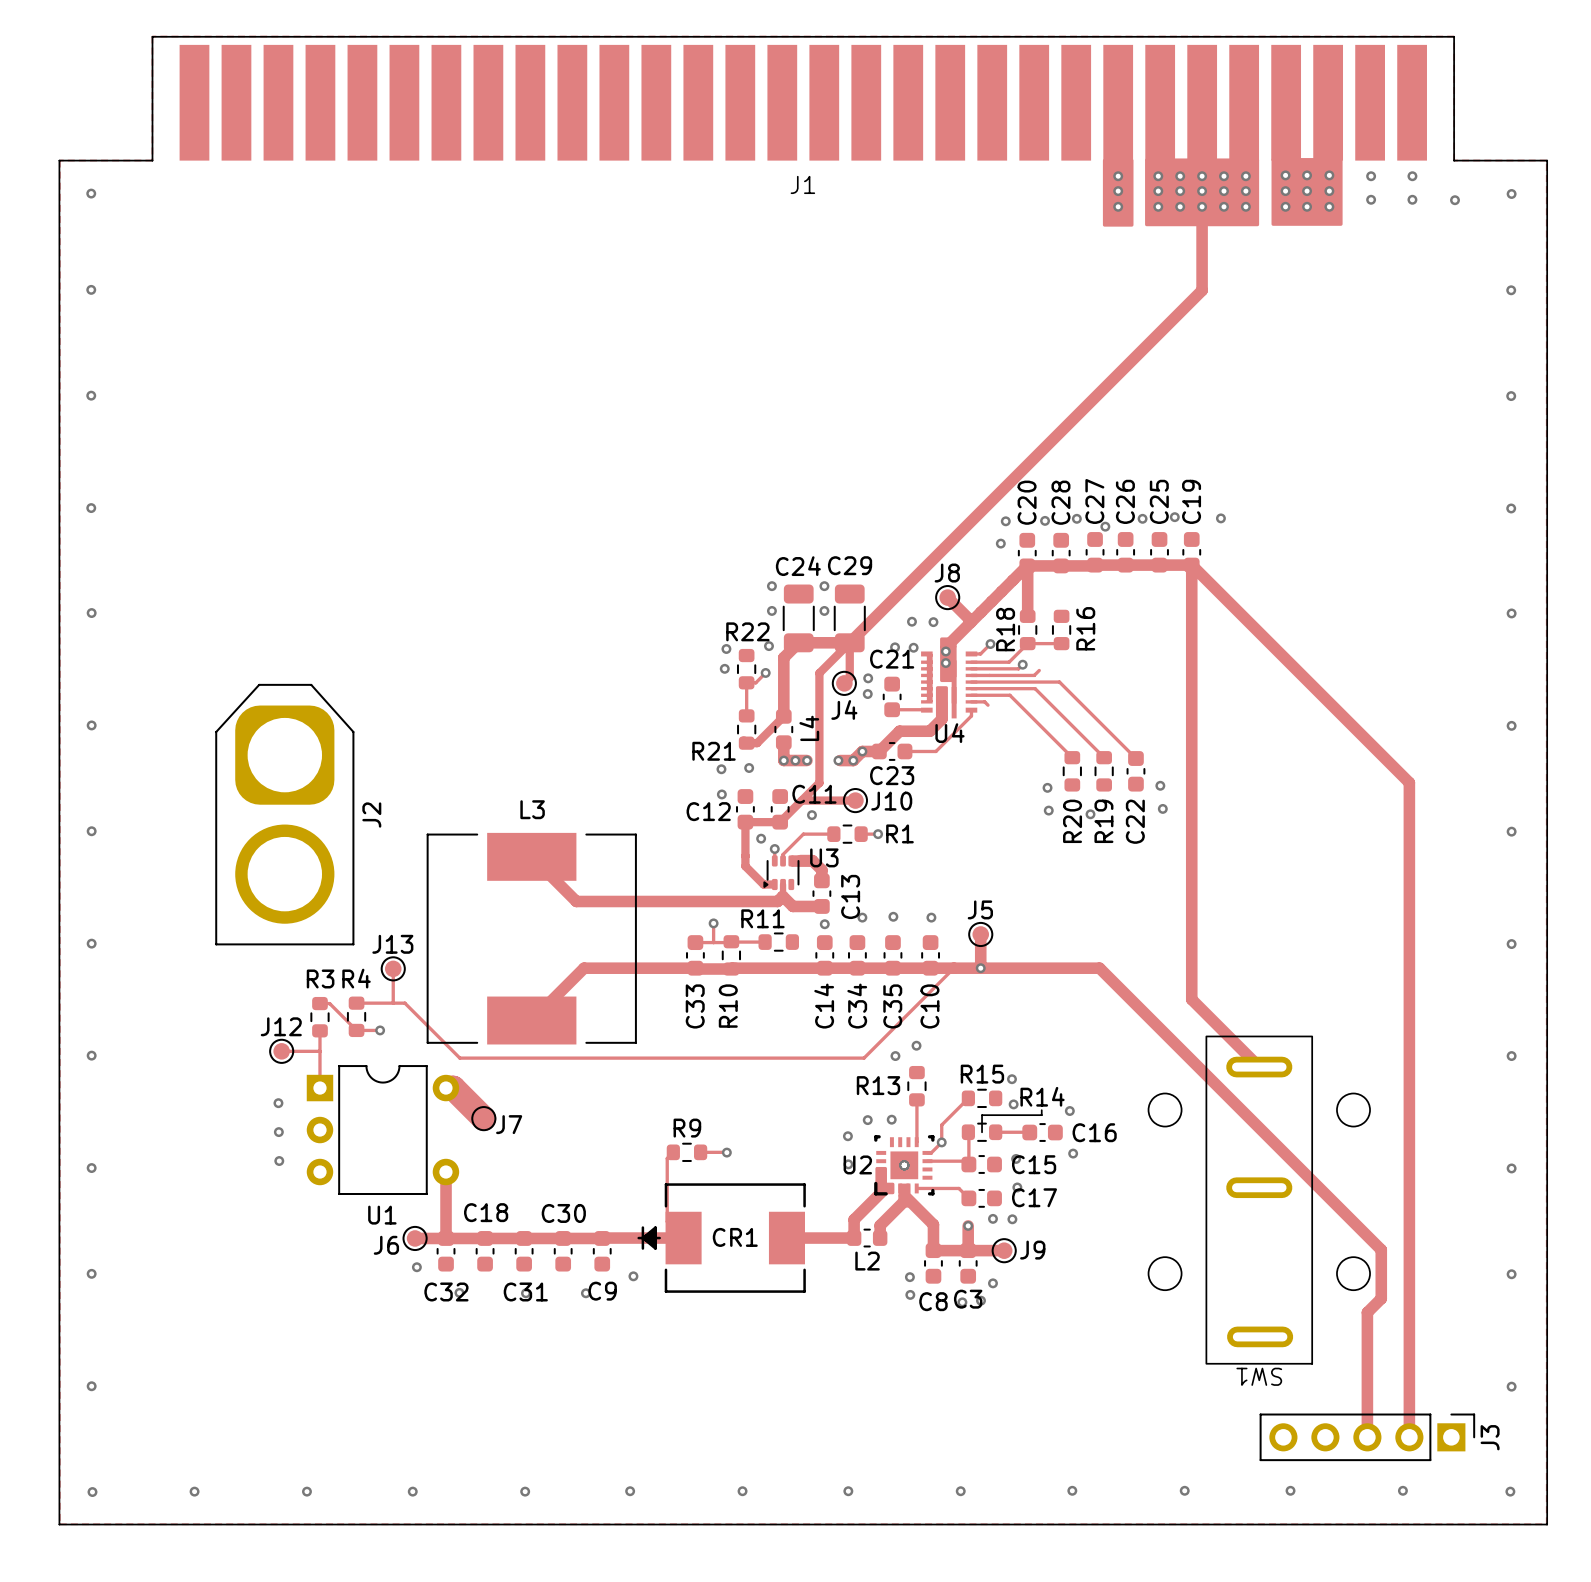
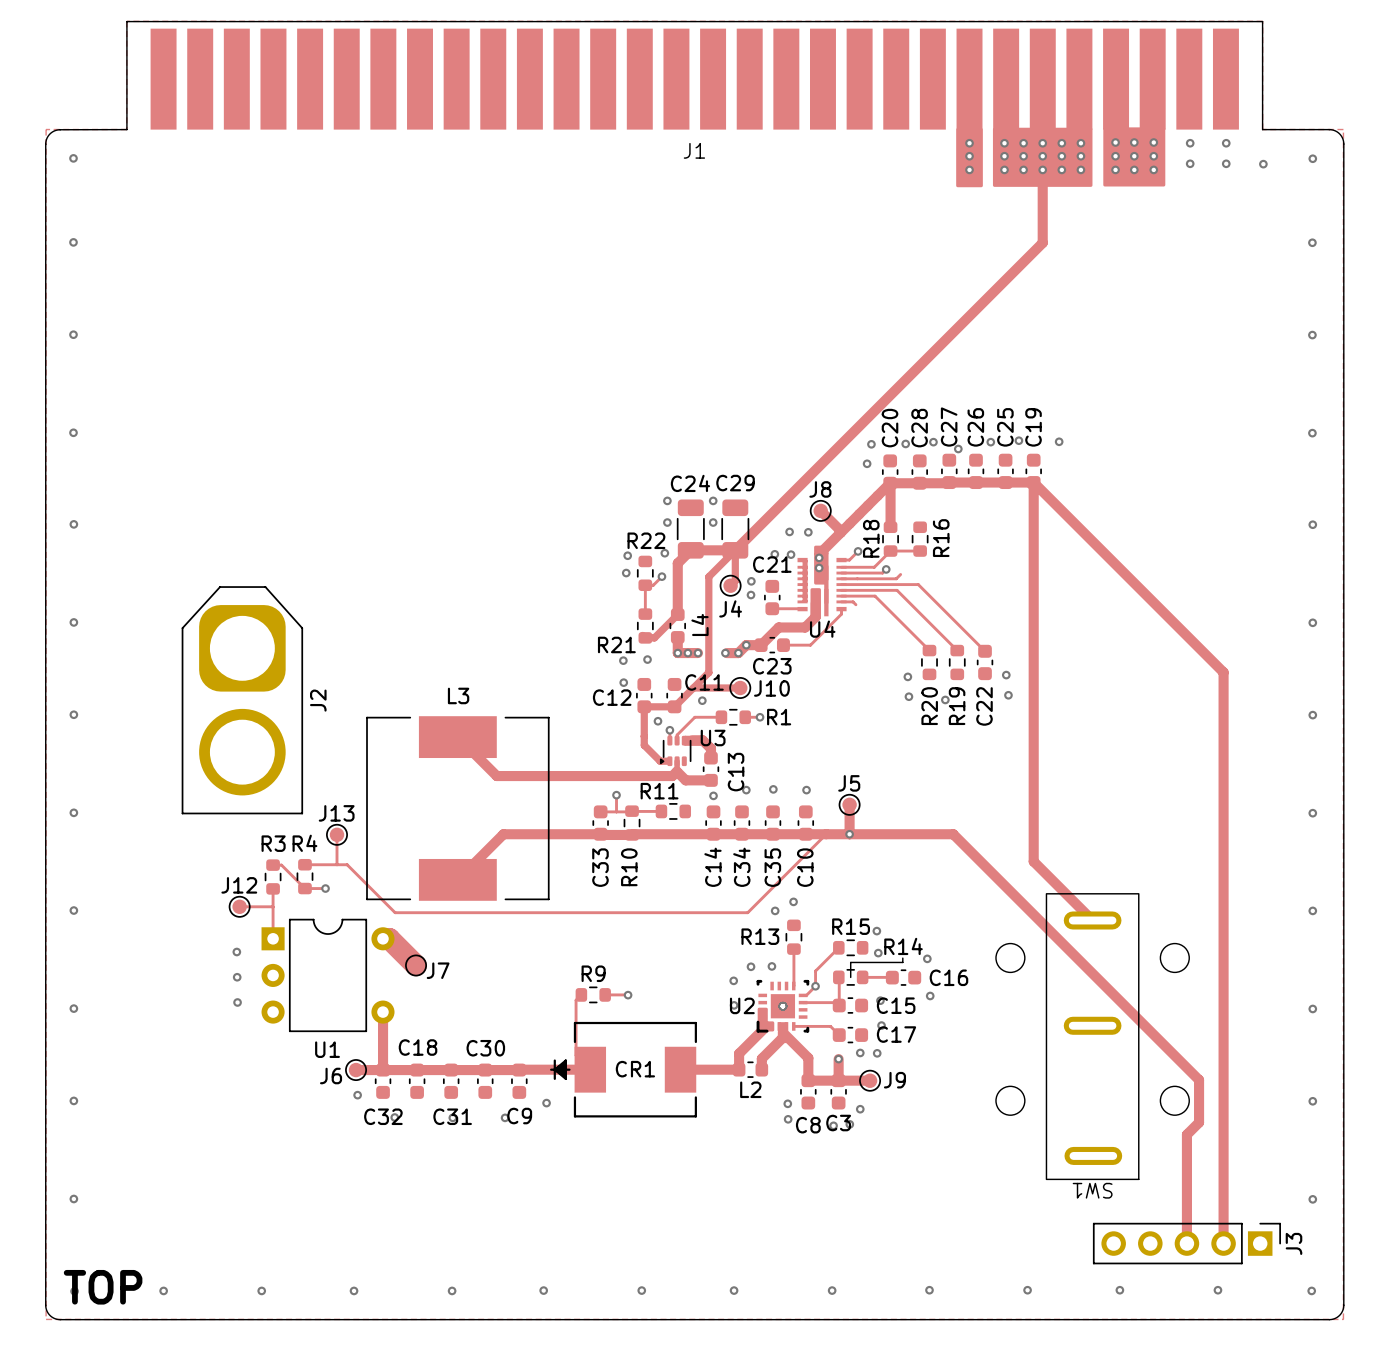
J1 footprint: [59, 36, 1548, 1525] -> [45, 21, 1345, 1321]

